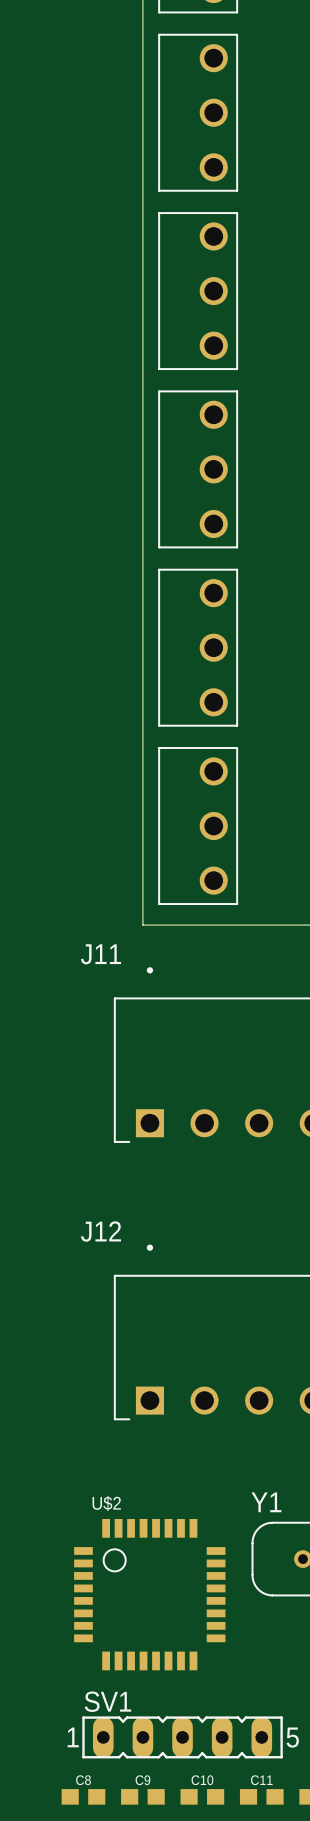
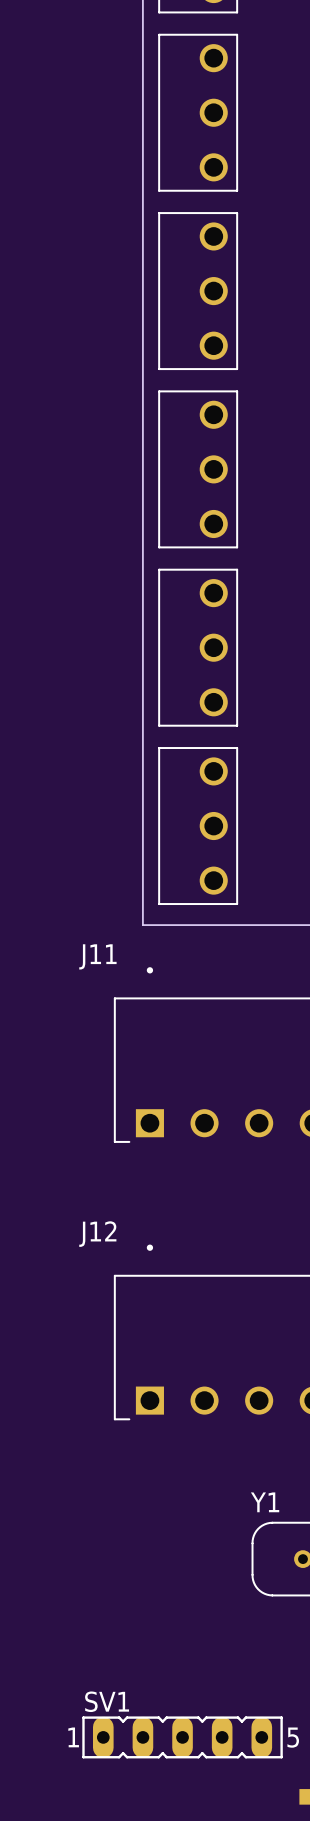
U$2: (149, 1594) -> none
C8: (83, 1796) -> none
C9: (142, 1796) -> none
C10: (202, 1796) -> none
C11: (261, 1796) -> none

